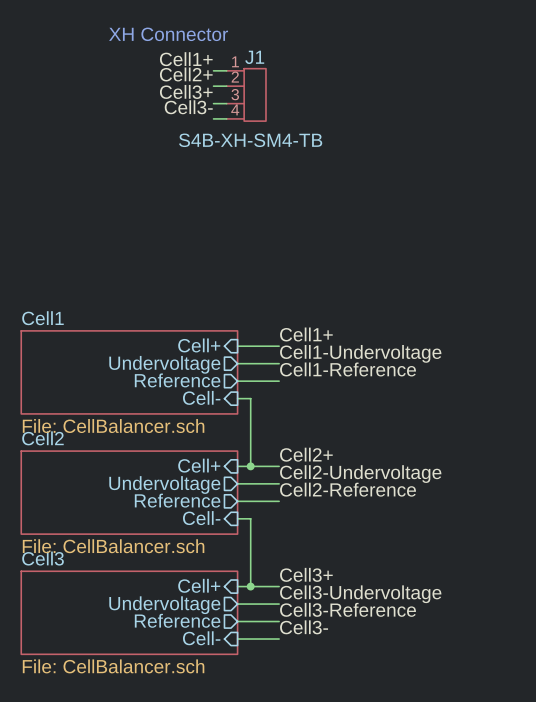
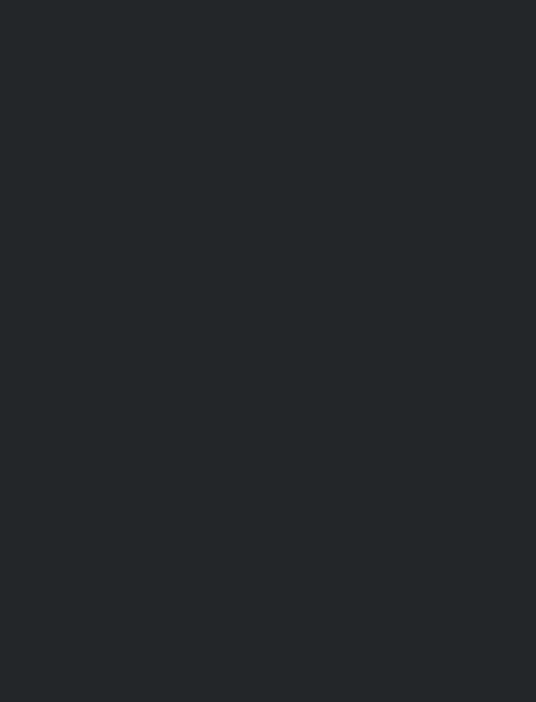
text: XH Connector (168, 34) -> none
label: Cell1+ (186, 59) -> none
wire: (213, 70) (226, 70) -> none
label: Cell2+ (186, 74) -> none
wire: (213, 86) (226, 86) -> none
label: Cell3+ (186, 91) -> none
J1: S4B-XH-SM4-TB (246, 94) -> none
wire: (213, 103) (226, 103) -> none
label: Cell3- (188, 107) -> none
wire: (213, 118) (226, 118) -> none
label: Cell1+ (306, 334) -> none
sheet pin: Cell+ (199, 345) -> none
wire: (237, 346) (279, 346) -> none
label: Cell1-Undervoltage (360, 353) -> none
wire: (237, 363) (279, 363) -> none
sheet pin: Undervoltage (164, 364) -> none
label: Cell1-Reference (348, 369) -> none
sheet Cell1: File: CellBalancer.sch (129, 372) -> none
sheet pin: Reference (177, 380) -> none
wire: (237, 381) (279, 381) -> none
sheet pin: Cell- (201, 397) -> none
wire: (237, 398) (250, 398) (250, 466) -> none
label: Cell2+ (306, 454) -> none
sheet pin: Cell+ (199, 465) -> none
wire: (237, 466) (279, 466) -> none
junction: (250, 466) -> none
label: Cell2-Undervoltage (360, 474) -> none
wire: (237, 483) (279, 483) -> none
sheet pin: Undervoltage (164, 485) -> none
label: Cell2-Reference (348, 489) -> none
sheet Cell2: File: CellBalancer.sch (129, 492) -> none
sheet pin: Reference (177, 500) -> none
wire: (237, 501) (279, 501) -> none
sheet pin: Cell- (201, 518) -> none
wire: (237, 518) (250, 518) (250, 586) -> none
label: Cell3+ (306, 574) -> none
sheet pin: Cell+ (199, 585) -> none
wire: (237, 586) (279, 586) -> none
junction: (250, 586) -> none
label: Cell3-Undervoltage (360, 594) -> none
wire: (237, 604) (279, 604) -> none
sheet pin: Undervoltage (164, 605) -> none
label: Cell3-Reference (348, 609) -> none
sheet Cell3: File: CellBalancer.sch (129, 612) -> none
sheet pin: Reference (177, 620) -> none
wire: (237, 621) (279, 621) -> none
label: Cell3- (304, 627) -> none
sheet pin: Cell- (201, 638) -> none
wire: (237, 639) (279, 639) -> none

